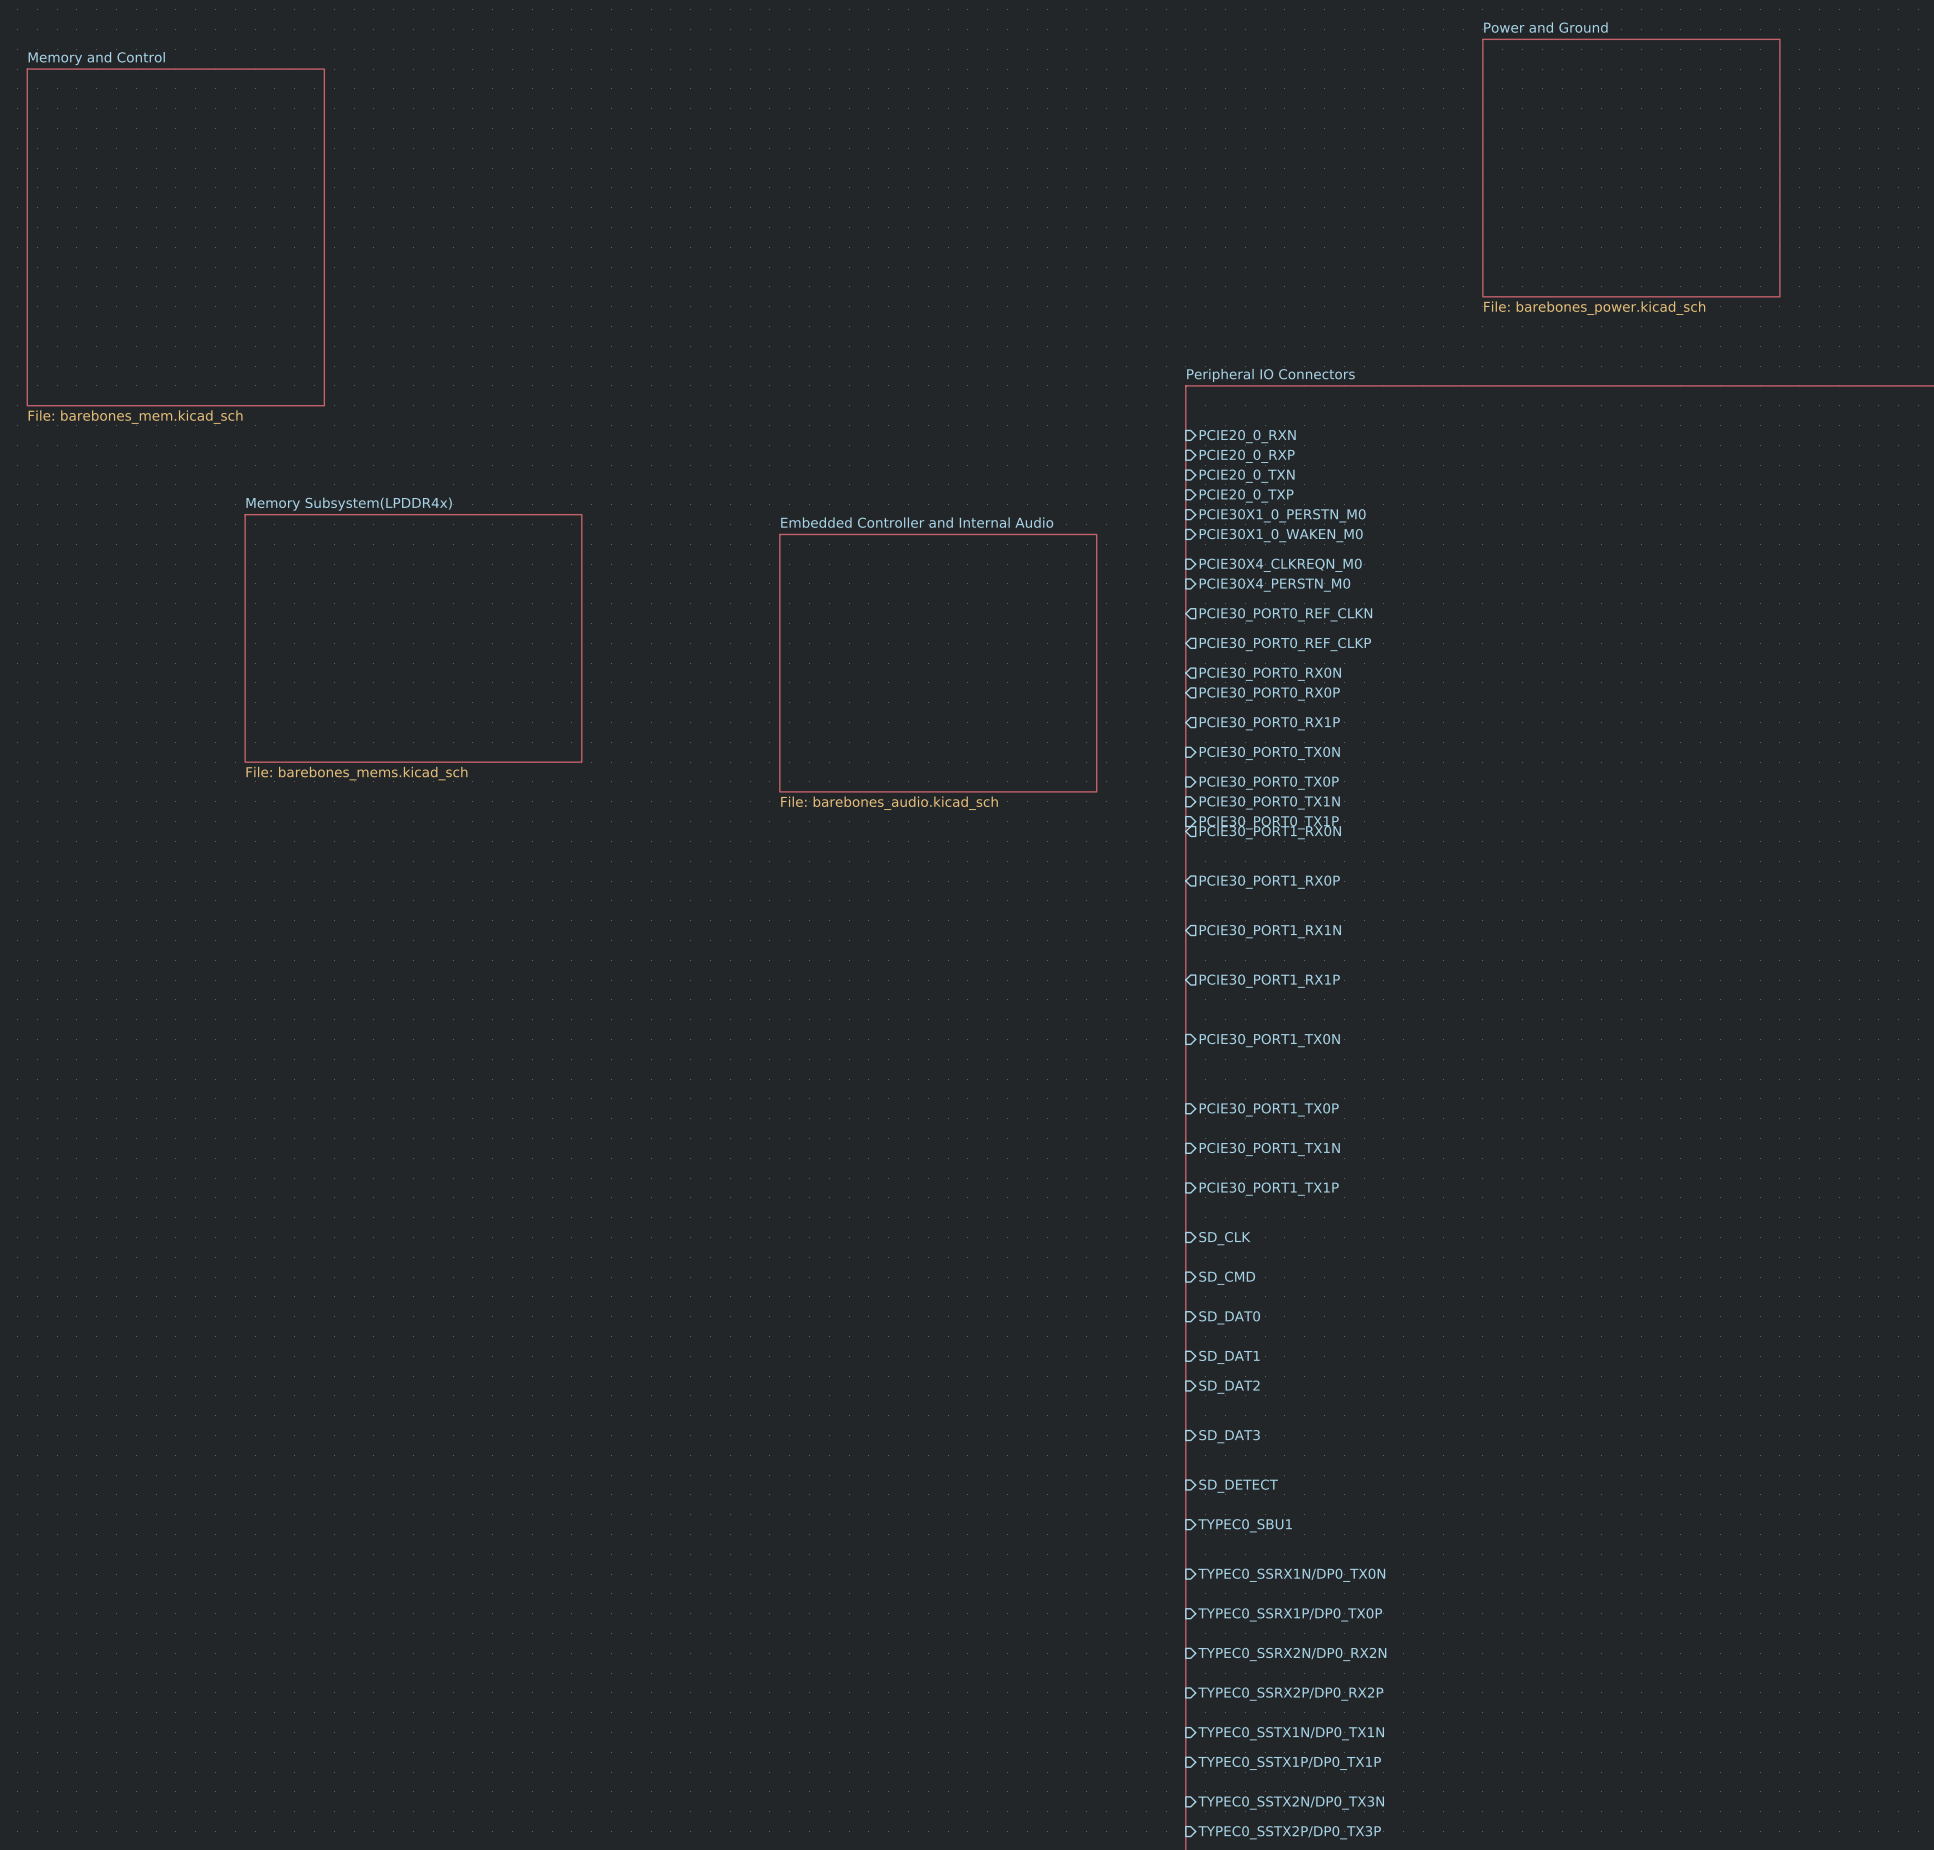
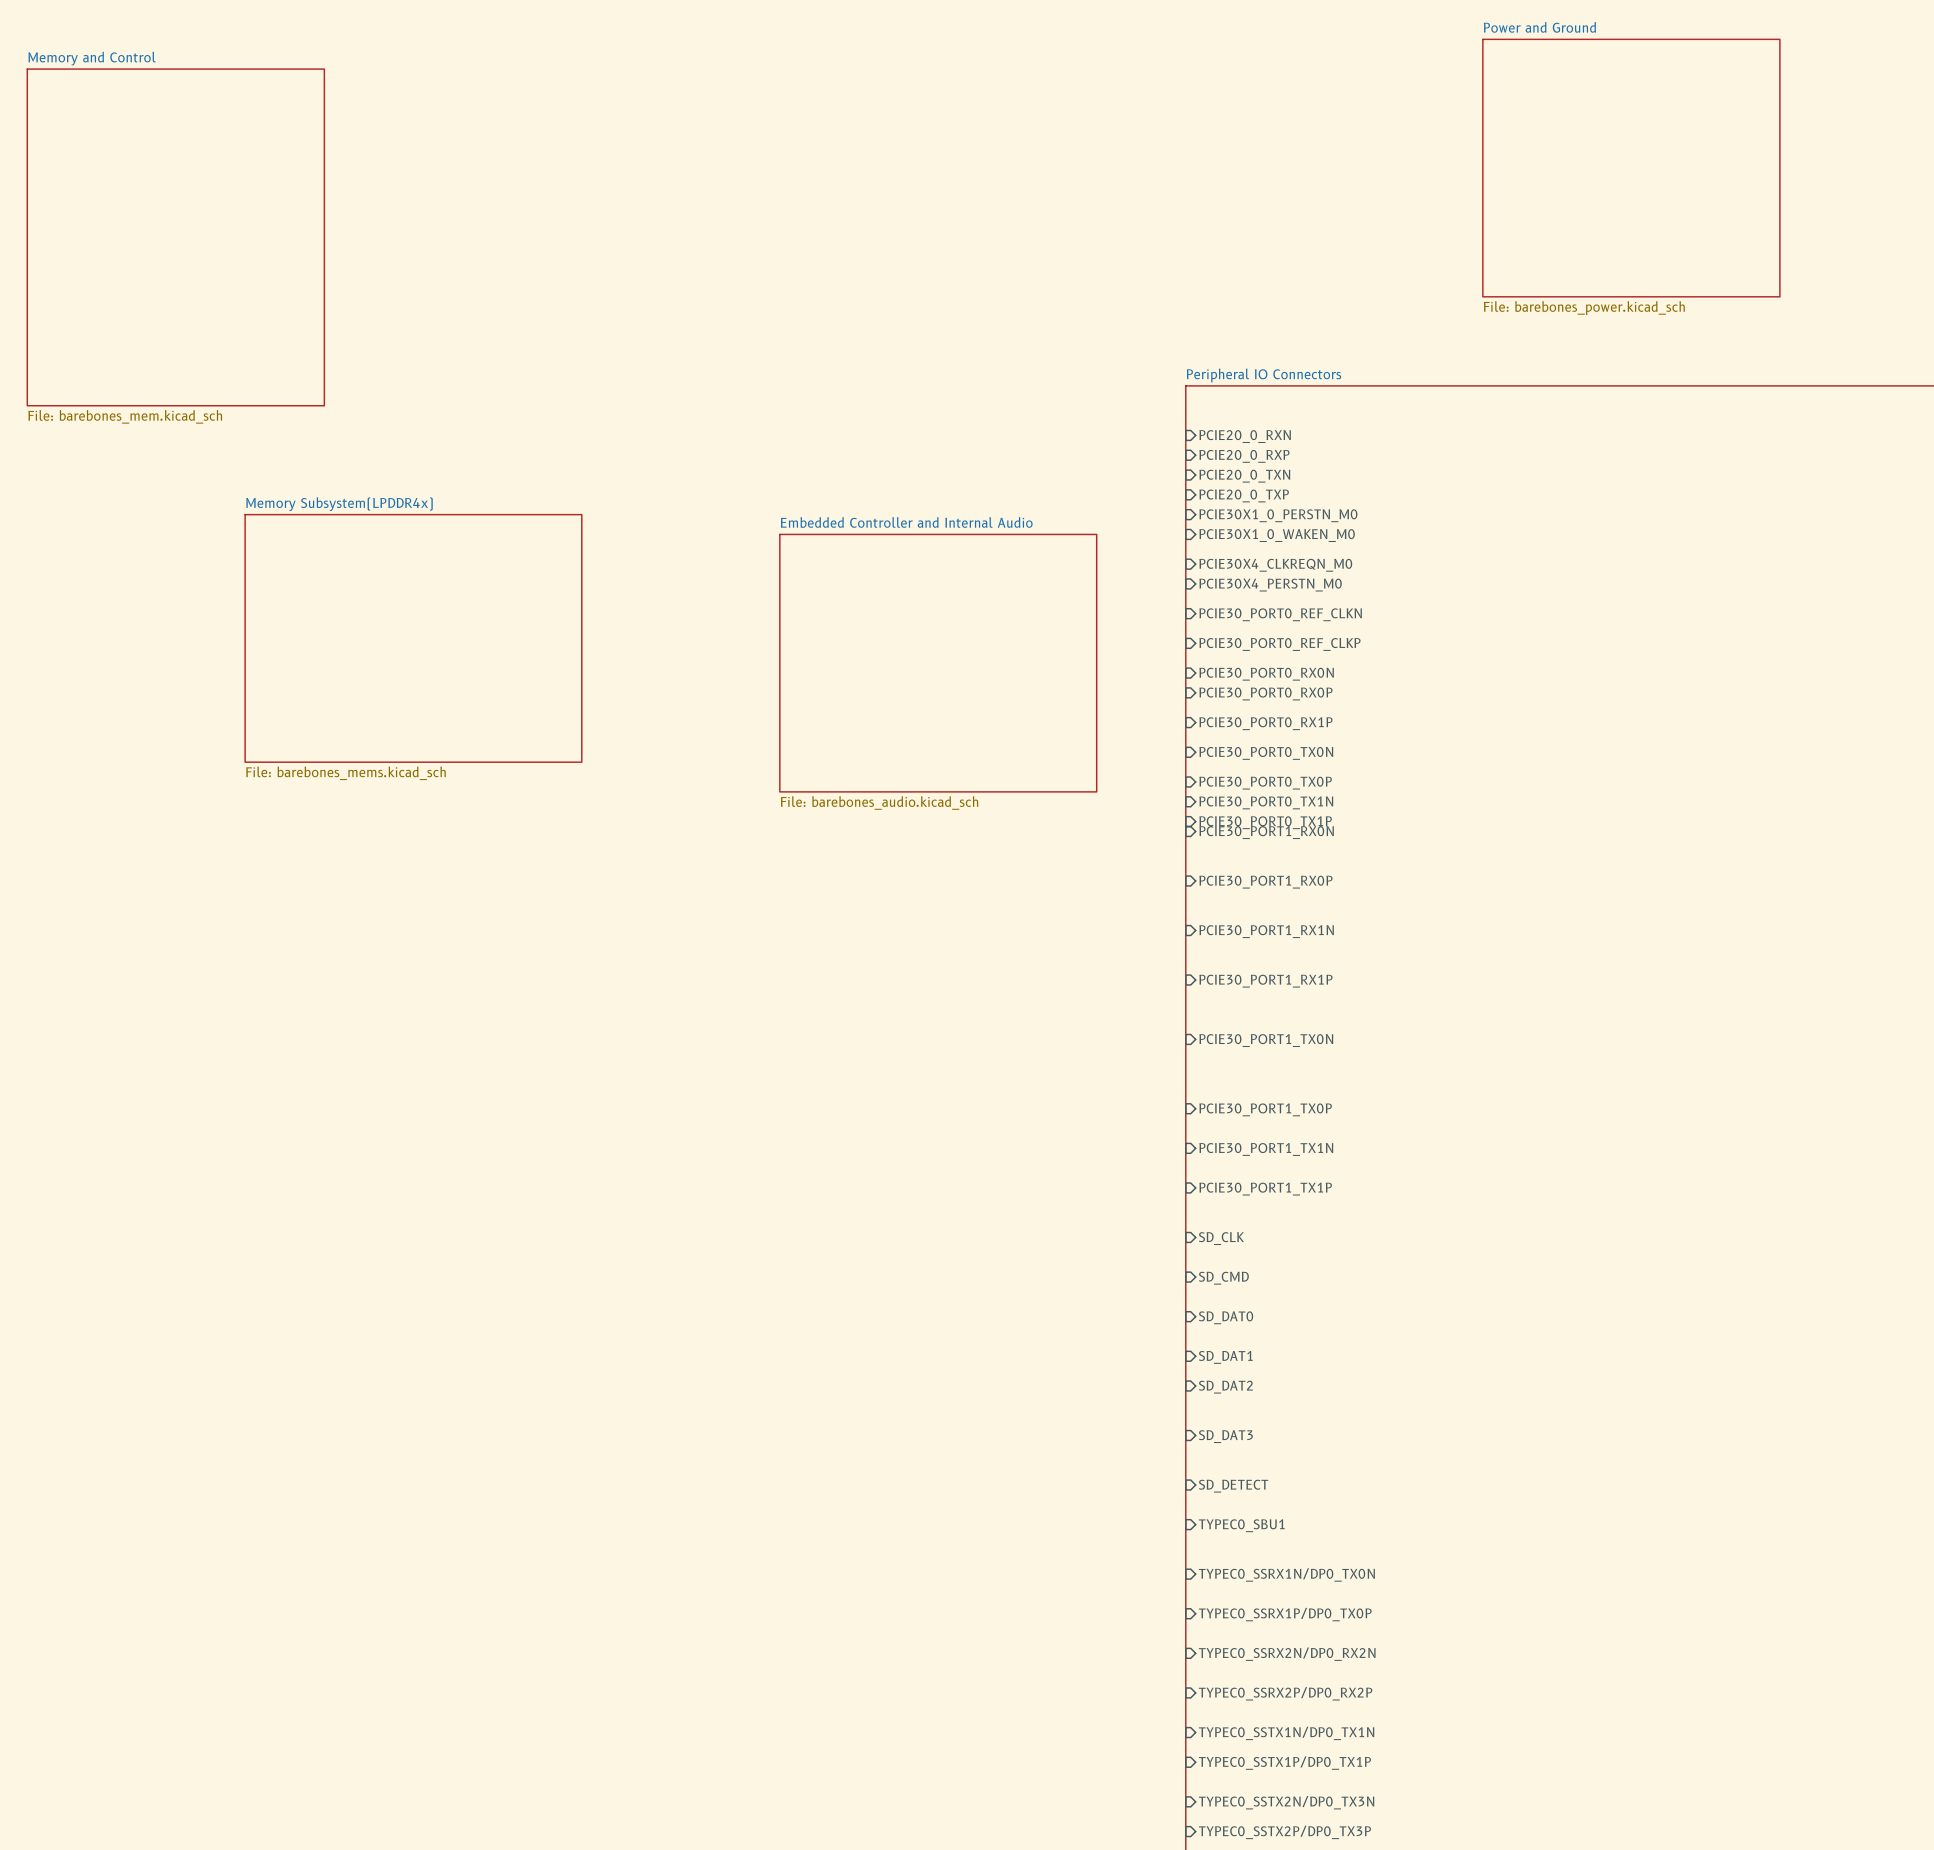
sheet pin shape: output (1285, 614) -> input (1280, 614)
sheet pin shape: output (1285, 644) -> input (1279, 644)
sheet pin shape: output (1270, 674) -> input (1266, 674)
sheet pin shape: output (1269, 694) -> input (1265, 693)
sheet pin shape: output (1269, 723) -> input (1265, 723)
sheet pin shape: output (1270, 832) -> input (1266, 832)
sheet pin shape: output (1269, 882) -> input (1265, 882)
sheet pin shape: output (1270, 931) -> input (1266, 931)
sheet pin shape: output (1269, 981) -> input (1265, 981)

